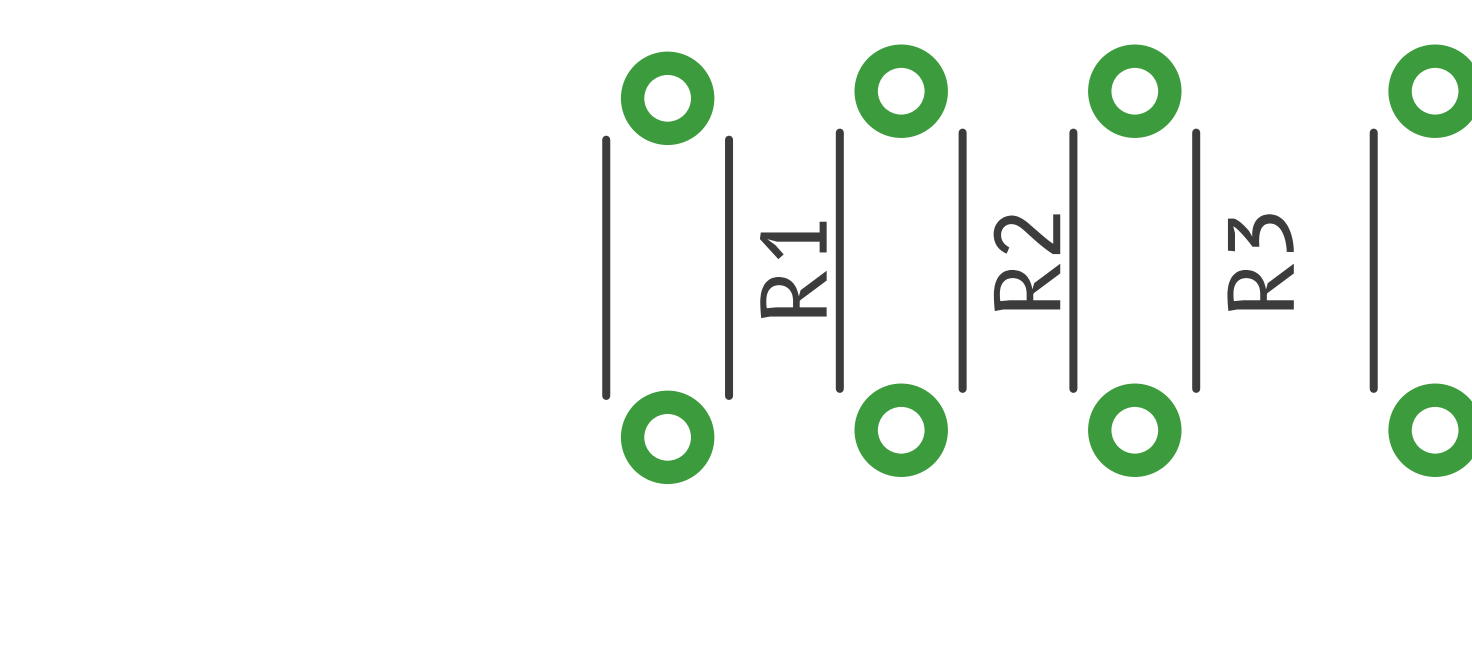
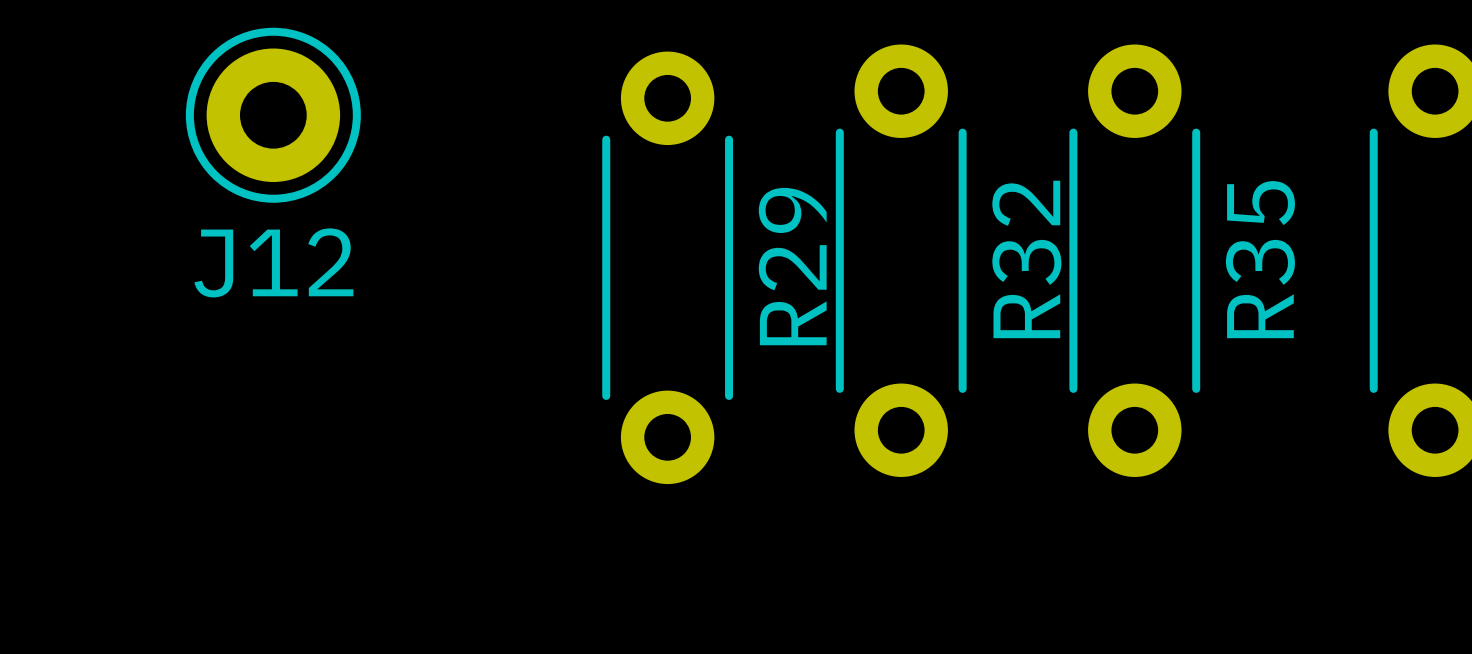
J12: none -> (273, 115)
R2 name: R2 (1026, 262) -> R32 (1026, 259)
R3 name: R3 (1260, 262) -> R35 (1260, 259)
R1 name: R1 (793, 269) -> R29 (792, 266)

